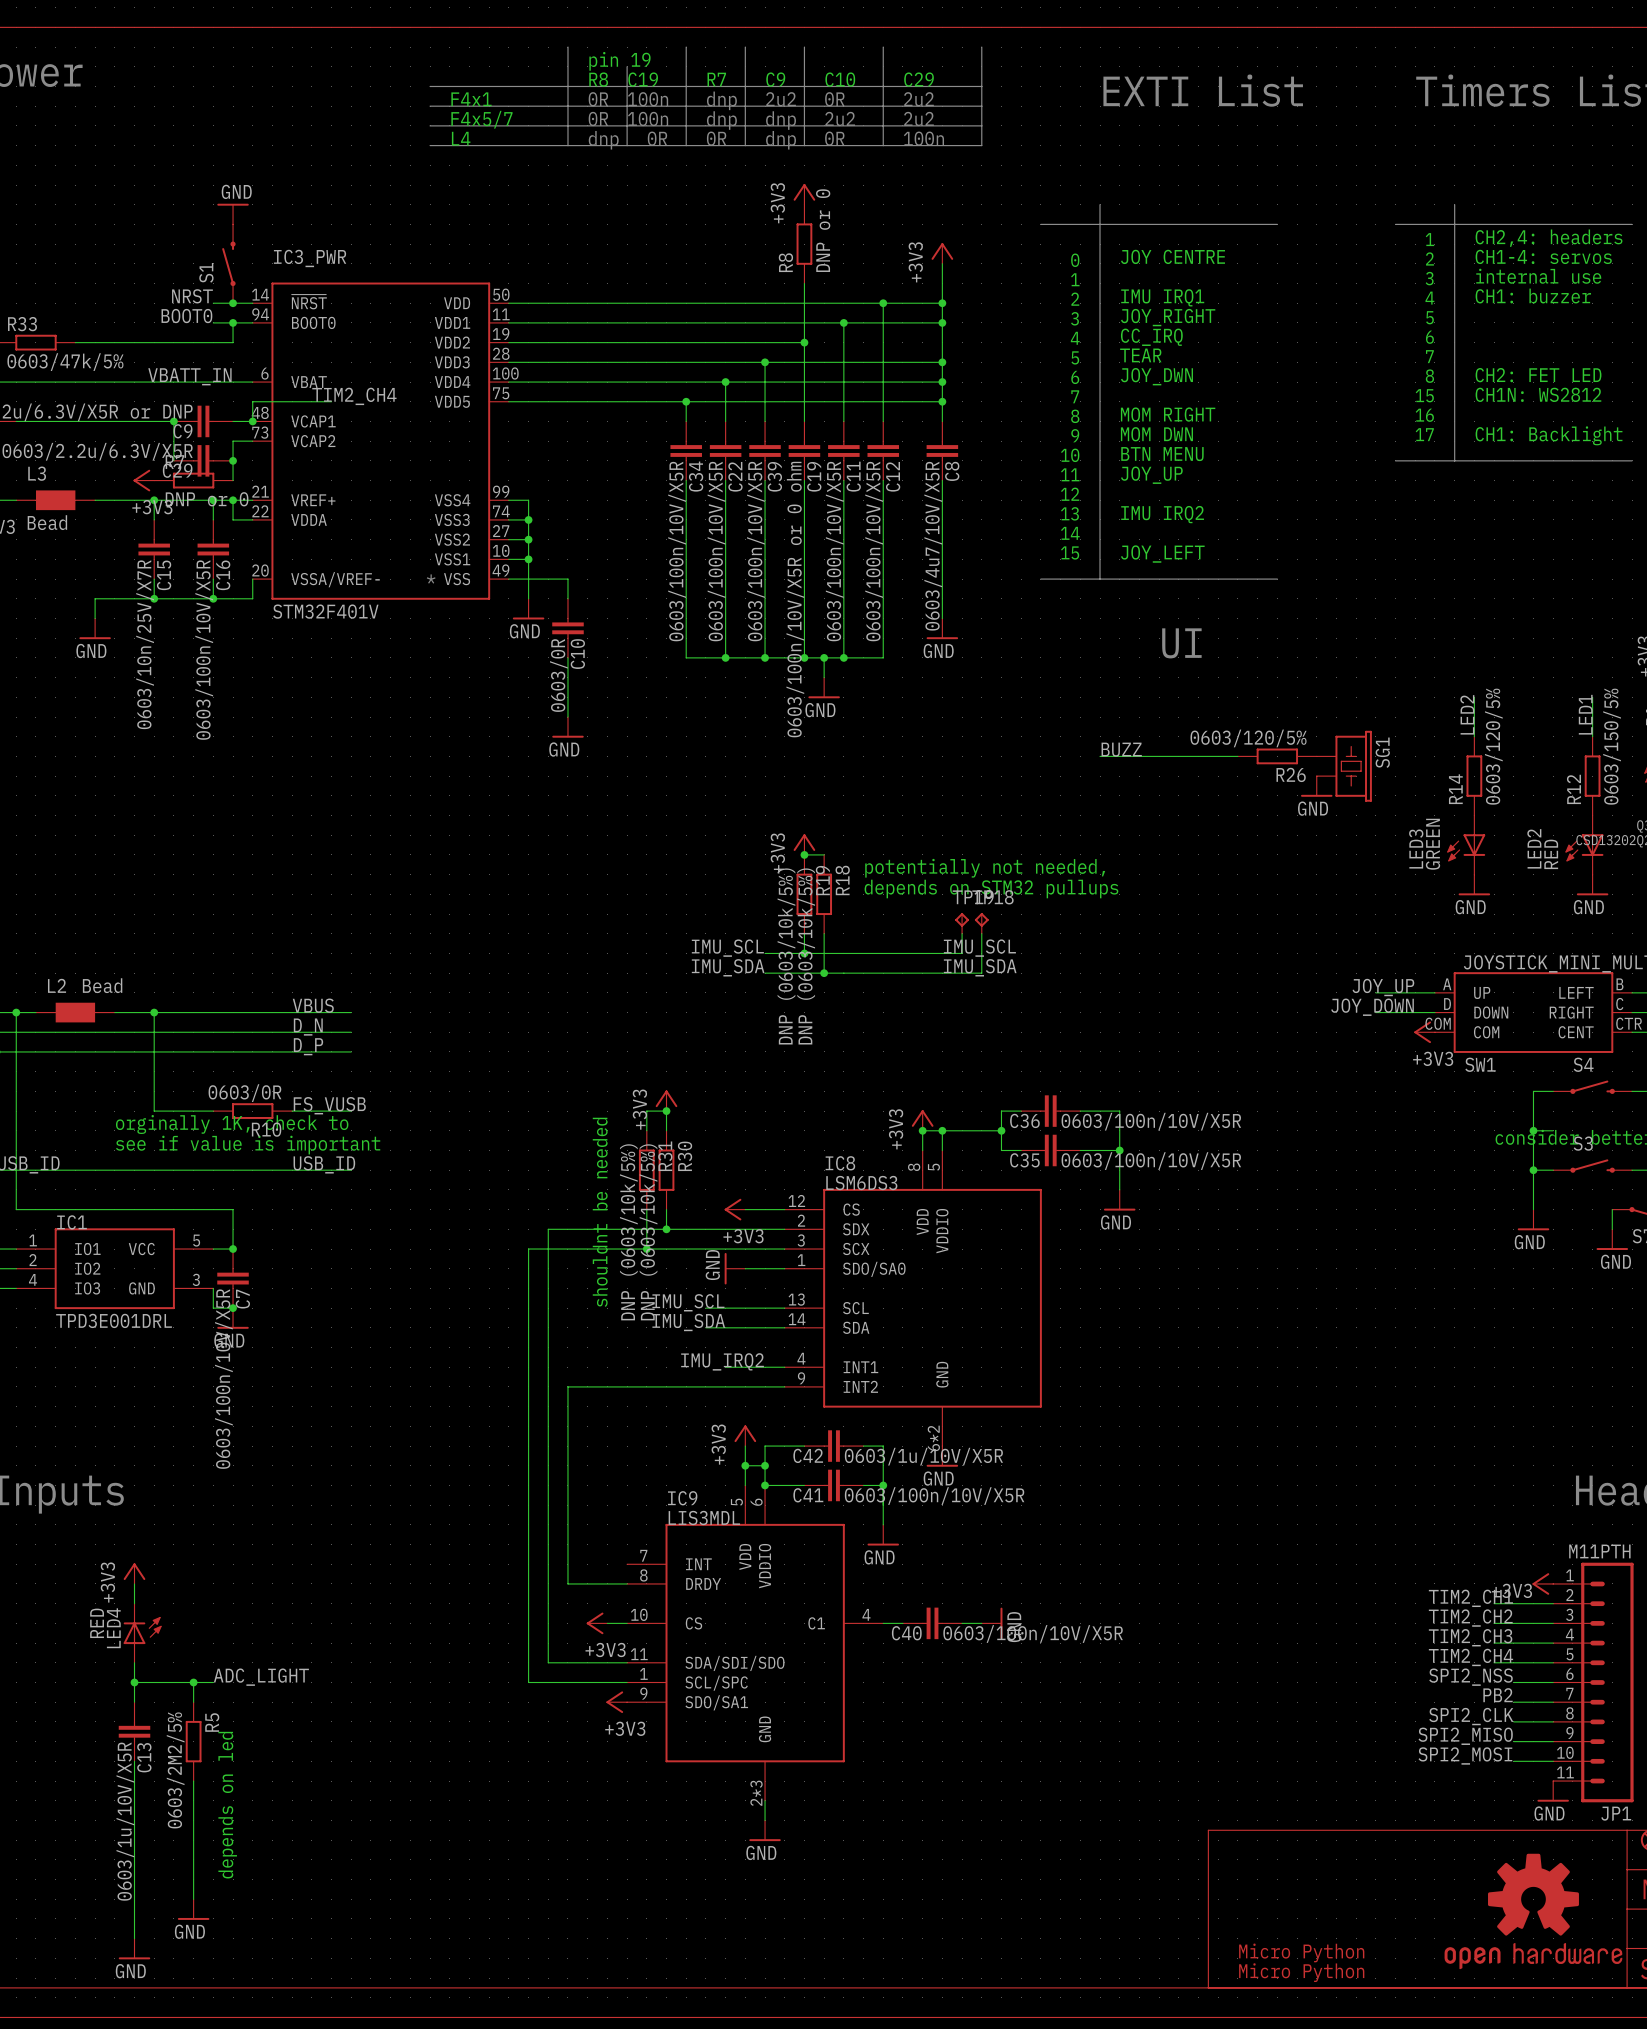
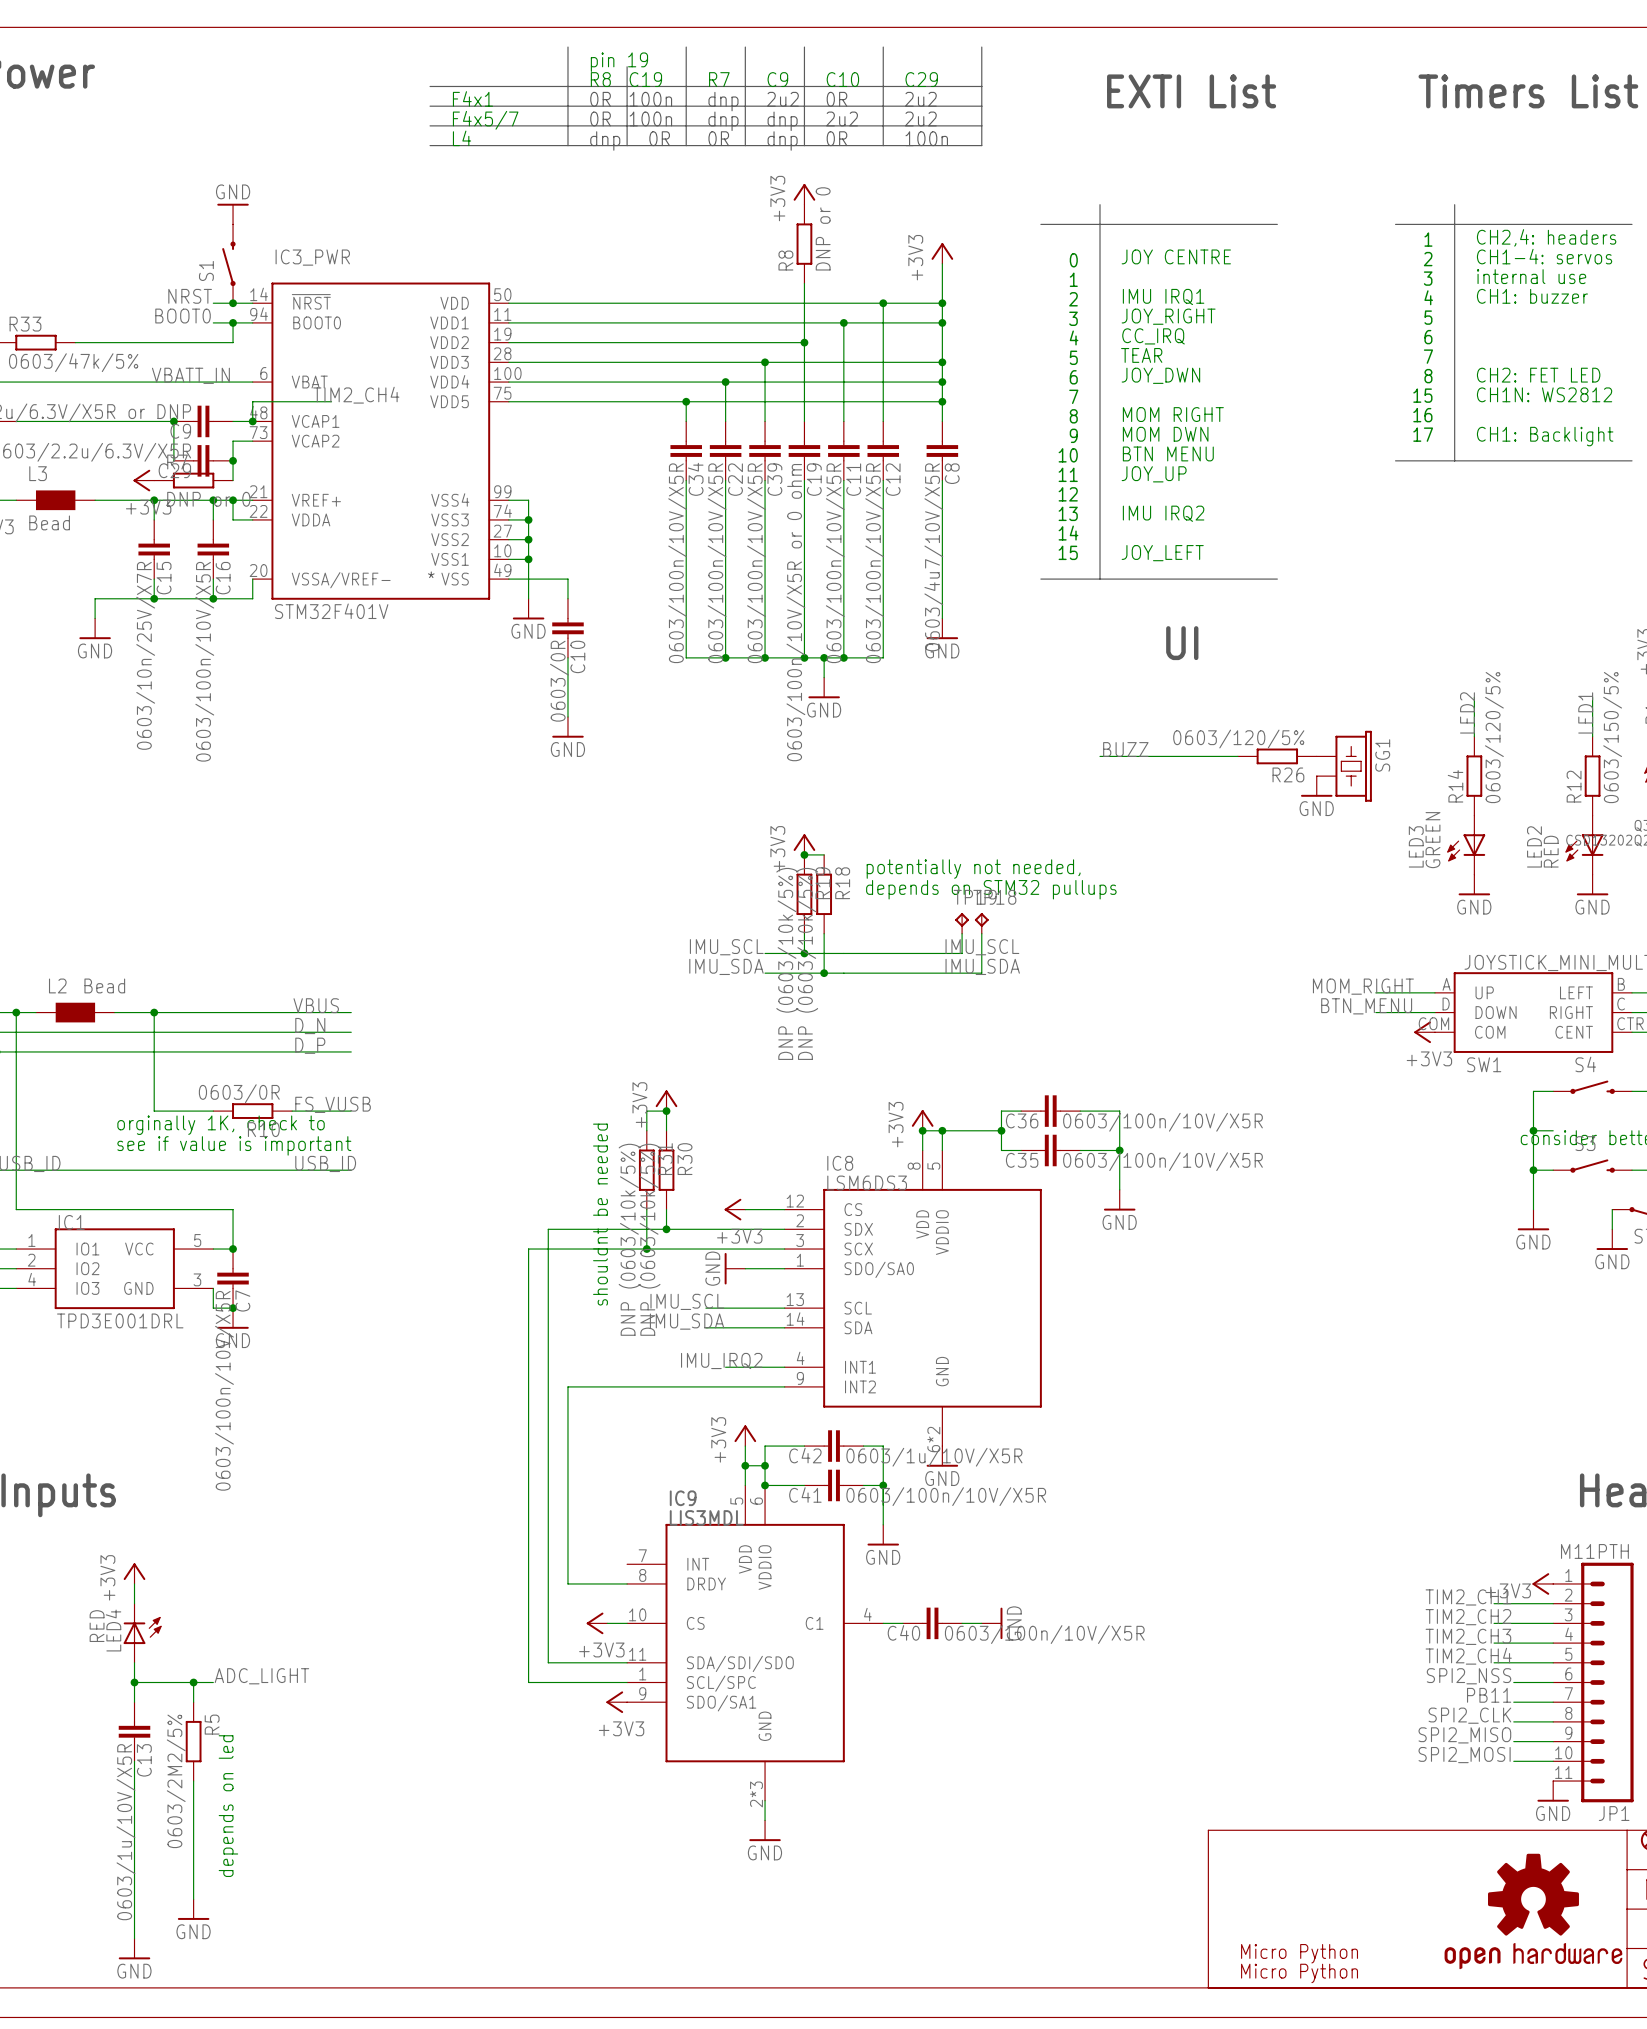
label: JOY_UP (1383, 987) -> MOM_RIGHT (1363, 986)
label: JOY_DOWN (1372, 1007) -> BTN_MENU (1366, 1006)
label: PB2 (1498, 1695) -> PB11 (1489, 1695)

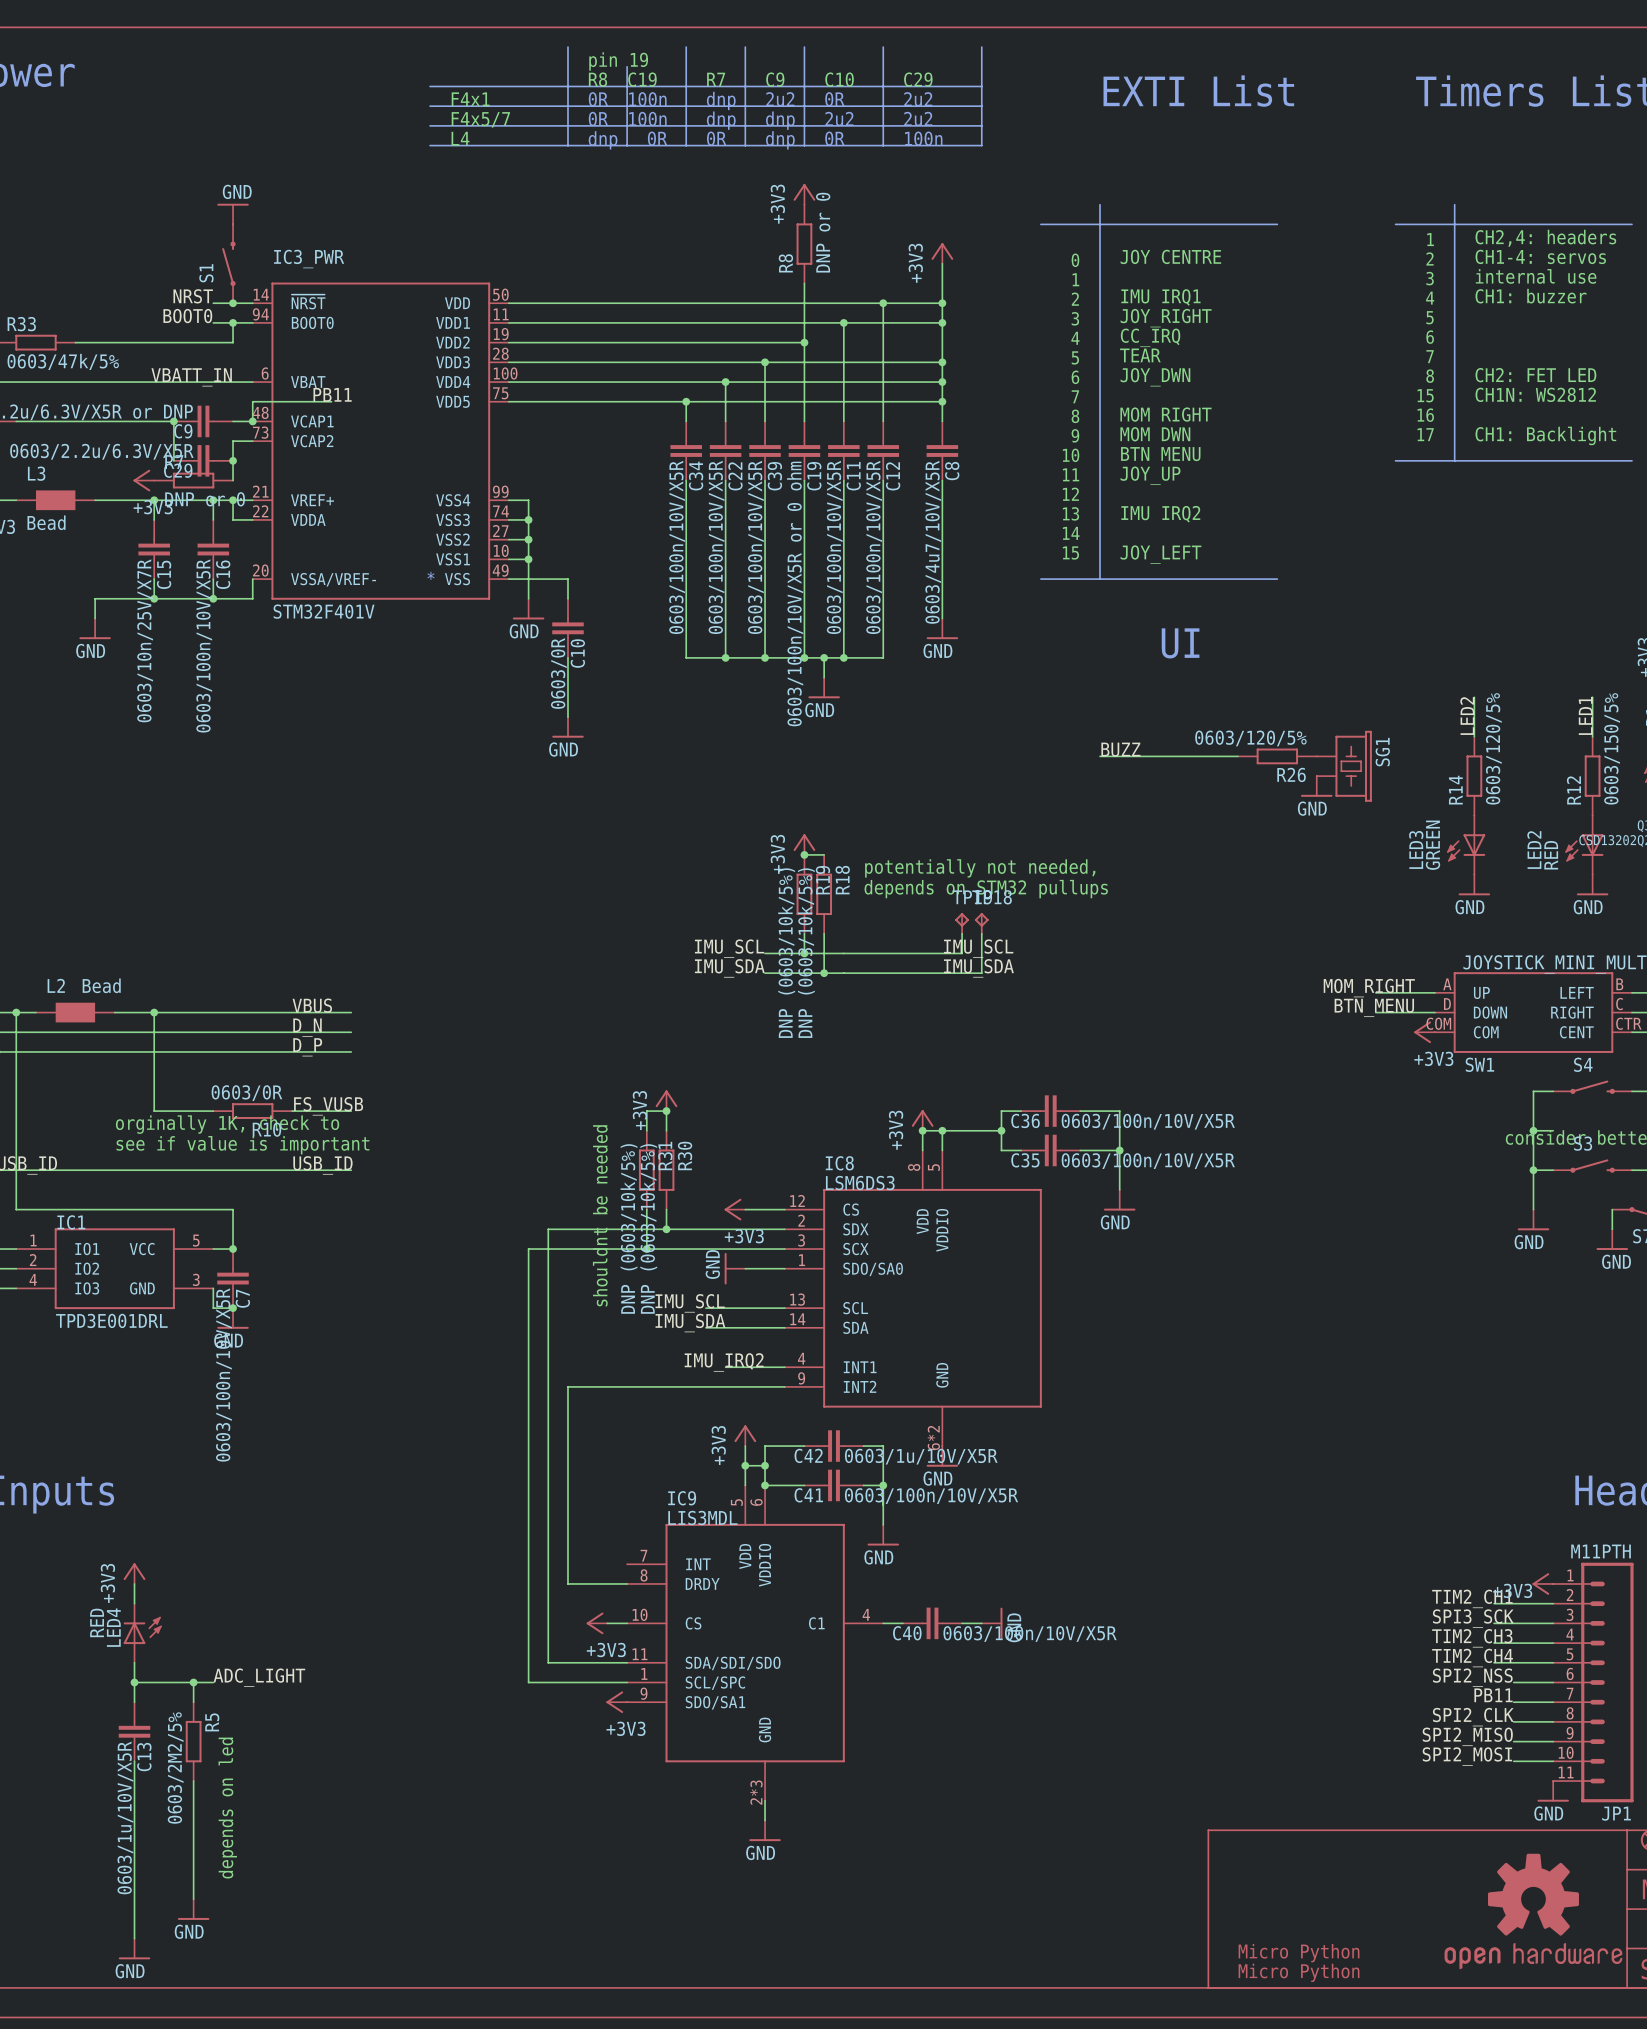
label: TIM2_CH4 (356, 395) -> PB11 (332, 394)
label: TIM2_CH2 (1468, 1617) -> SPI3_SCK (1473, 1618)

